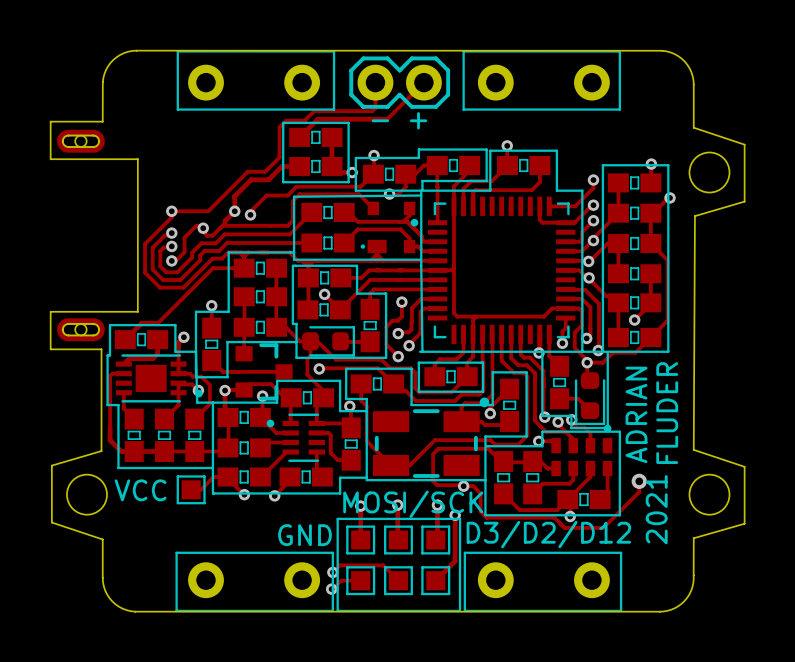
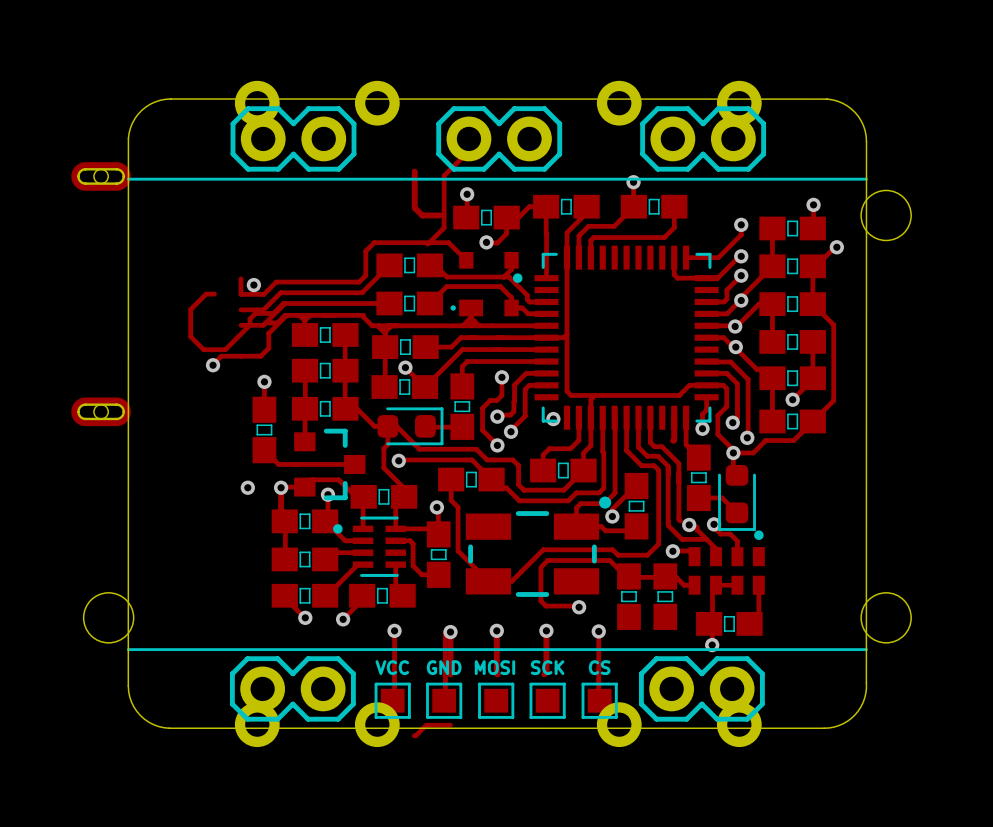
board edge: (136, 50) (662, 50) (674, 53) (684, 61) (689, 68) (693, 80) (693, 127) (744, 144) (744, 201) (694, 216) (693, 449) (744, 466) (744, 523) (693, 538) (693, 583) (684, 600) (671, 609) (659, 611) (135, 611) (122, 608) (112, 601) (105, 590) (103, 582) (102, 539) (51, 522) (51, 465) (101, 451) (101, 349) (50, 349) (50, 311) (137, 311) (137, 159) (50, 159) (50, 121) (102, 121) (102, 82) (106, 69) (110, 62) (120, 54) (136, 50) -> (170, 99) (155, 101) (141, 110) (132, 123) (128, 138) (128, 685) (131, 701) (144, 718) (153, 724) (169, 728) (824, 728) (838, 725) (855, 714) (863, 702) (866, 687) (866, 141) (863, 125) (851, 108) (842, 103) (827, 99) (170, 99)
line: (177, 51) (334, 51) (334, 109) (177, 109) (177, 51) -> none
line: (463, 51) (619, 51) (619, 109) (463, 109) (463, 51) -> none
track: (375, 82) (375, 107) (372, 111) (314, 111) (304, 120) -> none
part position: (399, 82) -> (499, 138)
track: (423, 82) (387, 119) (317, 119) (299, 137) -> none
part: none -> (293, 138)
part: none -> (703, 138)
track: (304, 120) (286, 120) (279, 127) (279, 157) (265, 171) (247, 171) (208, 211) (171, 211) (171, 217) (145, 244) (145, 272) (159, 287) (183, 287) (210, 260) -> (240, 325) (263, 325)
track: none -> (468, 151) (444, 175) (444, 227) (427, 244)
text: - + (399, 120) -> none
line: (283, 122) (283, 182) (348, 182) (348, 122) (283, 122) -> none
part: (315, 137) -> none
line: none -> (128, 179) (866, 179)
track: (299, 166) (281, 166) (268, 179) (251, 179) (234, 196) (234, 211) (211, 235) -> (277, 282) (263, 294)
part: (315, 166) -> none
via: (352, 172) -> none
track: (373, 174) (360, 186) (296, 186) (287, 195) (266, 195) (252, 209) (252, 216) -> none
line: (422, 189) (422, 181) (486, 181) (486, 149) (418, 149) (418, 157) (355, 157) (355, 190) (490, 190) (490, 150) (556, 150) (556, 190) (582, 190) (582, 351) -> none
line: (421, 190) (422, 351) -> none
line: (420, 195) (294, 196) (294, 259) (420, 259) -> none
via: (171, 211) -> none
via: (234, 211) -> none
via: (250, 214) -> none
via: (171, 233) -> none
track: (207, 235) (204, 233) (204, 225) (196, 225) (184, 237) (184, 252) (175, 260) (171, 260) -> (258, 294) (240, 294) (240, 278)
track: (215, 243) (201, 243) (192, 252) (192, 257) (177, 272) (166, 272) (160, 266) (160, 250) (163, 247) (171, 247) -> (269, 303) (263, 309) (240, 309)
via: (171, 246) -> none
track: none -> (286, 315) (268, 333) (268, 348) (260, 356) (221, 356) (213, 364)
line: (294, 252) (228, 252) (228, 311) (195, 311) (195, 377) -> none
via: (171, 260) -> none
line: (292, 265) (357, 265) (357, 293) (386, 293) (386, 357) (296, 357) (296, 323) (292, 323) (292, 265) -> none
track: (244, 268) (212, 268) (157, 323) (141, 323) (125, 339) -> none
via: none -> (213, 365)
via: none -> (553, 419)
track: (183, 337) (178, 342) (178, 373) (201, 376) (209, 385) (209, 404) (194, 419) -> none
via: (183, 337) -> none
part: (141, 339) -> none
track: (157, 339) (157, 353) (152, 358) (129, 358) (123, 364) (128, 359) -> none
line: (296, 342) (227, 342) (227, 377) (197, 377) -> none
line: (420, 351) (668, 351) (668, 165) (602, 165) (602, 351) -> none
line: (542, 351) (542, 415) (571, 415) (571, 428) (607, 428) (607, 352) -> none
via: (538, 352) -> none
line: (418, 362) (418, 391) (483, 391) (483, 362) (418, 362) -> none
track: (123, 373) (112, 373) (110, 376) (110, 440) (121, 451) (224, 451) (228, 447) -> none
part: (159, 378) -> none
track: (198, 390) (192, 384) (178, 383) (178, 405) (164, 419) -> none
track: (123, 392) (123, 408) (134, 419) -> none
line: (212, 402) (212, 493) (340, 493) (340, 477) (366, 477) -> none
line: (366, 411) (340, 411) (340, 380) (277, 380) (277, 402) (197, 402) (195, 351) (175, 351) (175, 325) (110, 325) (110, 355) (107, 355) (107, 405) (118, 405) (118, 468) (211, 468) -> none
text: FLUDER (667, 413) -> none
text: ADRIAN (636, 414) -> none
via: (544, 417) -> none
via: none -> (689, 524)
via: (558, 422) -> none
part: (134, 435) -> none
part: (164, 435) -> none
part: (194, 435) -> none
line: (486, 446) (542, 446) (542, 431) (619, 431) (619, 515) (485, 515) (485, 436) (526, 436) (526, 372) (492, 372) (492, 405) (411, 405) (411, 368) (346, 368) (346, 399) (366, 399) (366, 480) (485, 480) -> none
track: (573, 468) (573, 480) (569, 483) (542, 483) (532, 493) -> (716, 585) (737, 585)
track: (590, 468) (590, 476) (557, 510) (519, 510) (503, 493) -> none
track: none -> (712, 588) (712, 619)
track: (228, 476) (213, 476) (200, 489) (191, 489) -> none
track: (639, 481) (639, 492) (603, 527) (564, 527) (554, 517) (486, 517) (480, 511) (480, 493) (473, 486) (463, 486) -> none
via: (639, 481) -> none
part: (191, 489) -> none
text: VCC (140, 490) -> none
text: MOSI/SCK (413, 504) -> none
track: none -> (394, 630) (394, 695) (392, 697)
via: none -> (394, 630)
track: none -> (598, 631) (599, 697)
track: none -> (445, 632) (444, 697)
text: 2021 (656, 509) -> none
track: (455, 515) (455, 561) (435, 580) -> none
via position: (455, 515) -> (598, 631)
line: (337, 518) (460, 518) (460, 610) (337, 610) (337, 518) -> none
line: none -> (128, 649) (866, 649)
text: D3/D2/D12 (548, 534) -> none
text: GND (304, 535) -> none
part: (360, 540) -> none
part: (398, 540) -> none
part: (435, 540) -> none
part: none -> (292, 688)
part: none -> (701, 688)
line: (176, 552) (332, 552) (332, 610) (176, 610) (176, 552) -> none
line: (464, 552) (621, 552) (621, 610) (464, 610) (464, 552) -> none
VCC: none -> (392, 700)
GND: none -> (444, 700)
MOSI: none -> (496, 700)
SCK: none -> (547, 700)
CS: none -> (599, 700)
track: (332, 572) (339, 565) (383, 565) (398, 580) -> none
via: (332, 572) -> none
part: (360, 580) -> none
part: (398, 580) -> none
part: (435, 580) -> none
via: (331, 589) -> none

